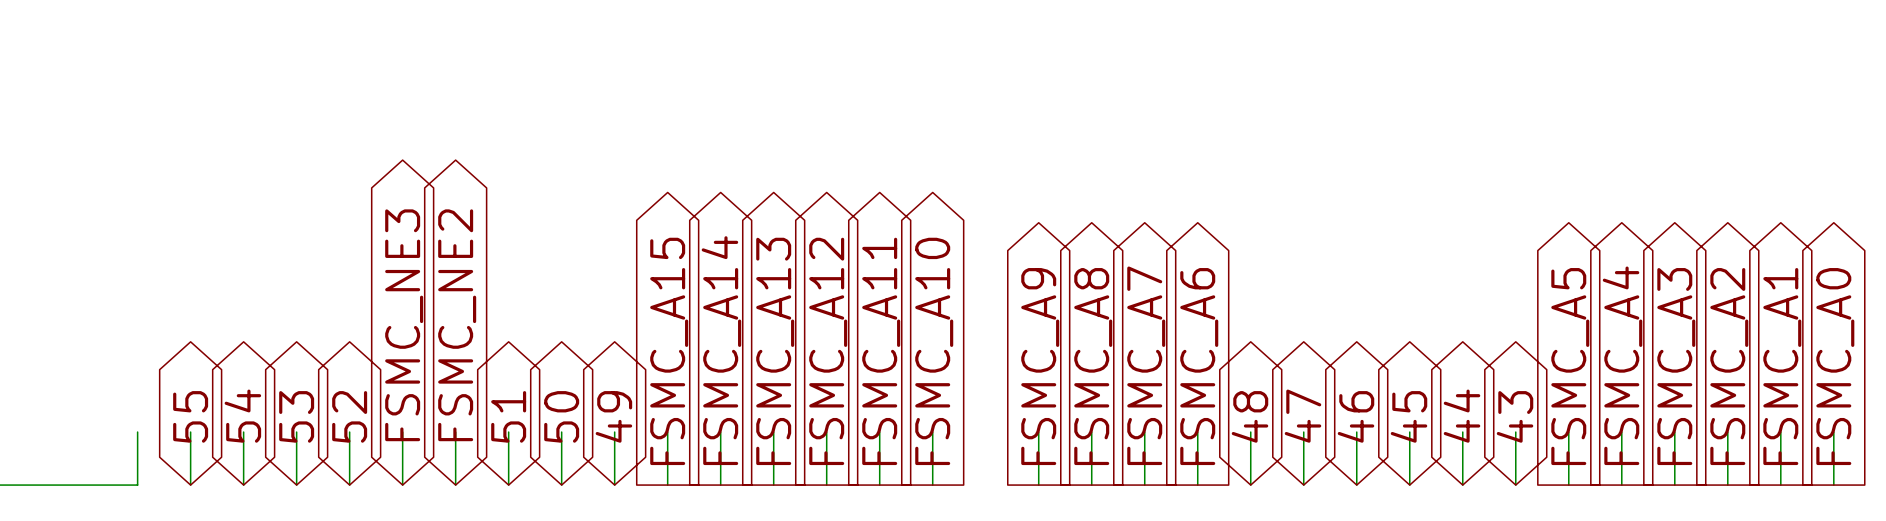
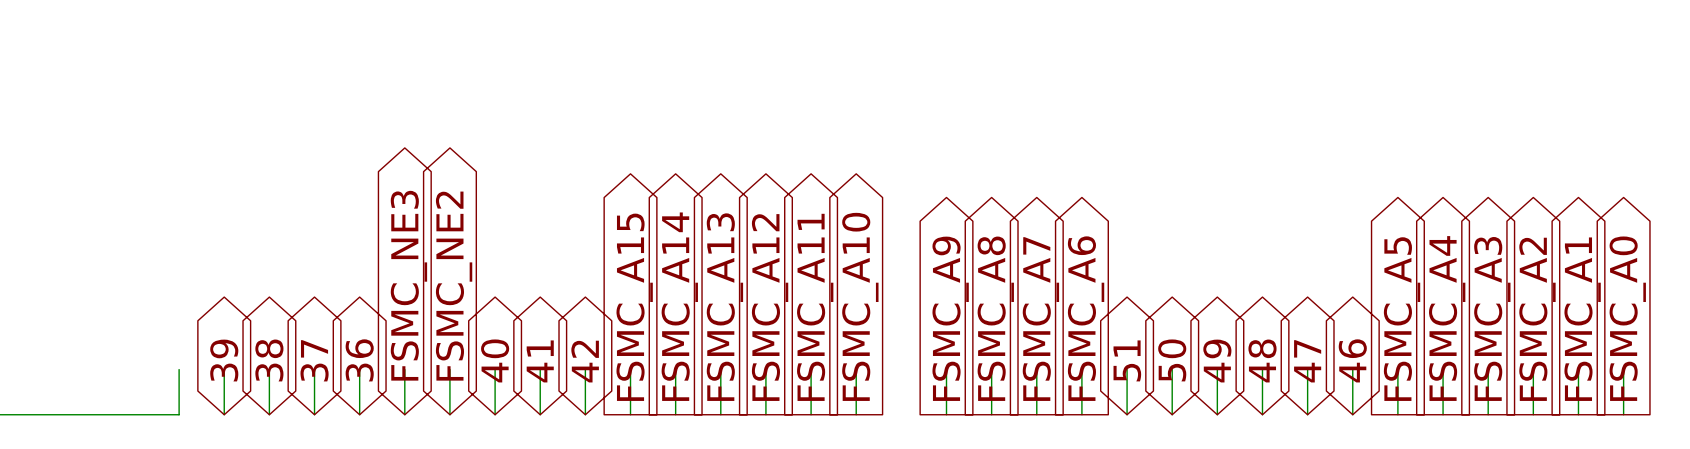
global label: 55 (190, 416) -> 39 (224, 360)
global label: 54 (242, 416) -> 38 (269, 360)
global label: 53 (296, 416) -> 37 (314, 360)
global label: 52 (349, 416) -> 36 (359, 360)
global label: 51 (508, 416) -> 40 (495, 360)
global label: 50 (561, 416) -> 41 (540, 361)
global label: 49 (613, 416) -> 42 (585, 361)
global label: 48 (1249, 416) -> 51 (1127, 360)
global label: 47 (1302, 416) -> 50 (1172, 360)
global label: 46 (1356, 416) -> 49 (1217, 361)
global label: 45 (1409, 416) -> 48 (1262, 360)
global label: 44 (1462, 416) -> 47 (1307, 361)
global label: 43 (1515, 416) -> 46 (1352, 360)

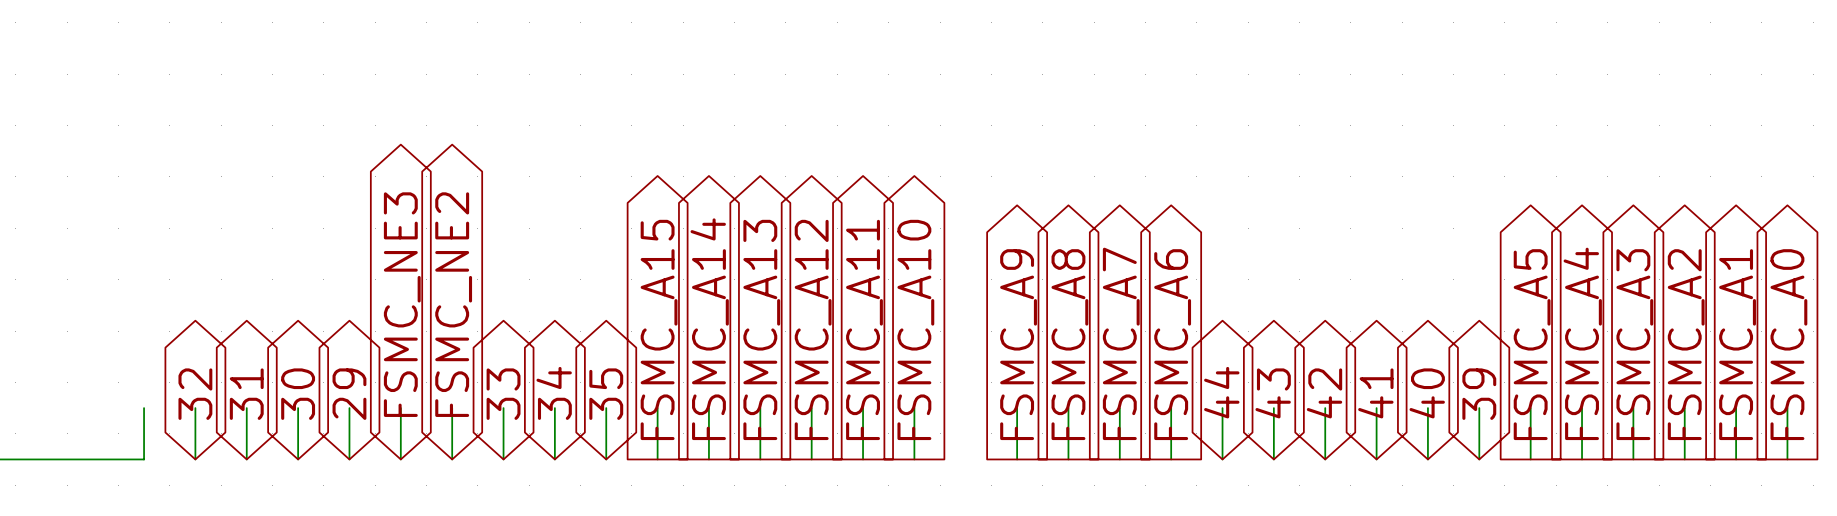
global label: 39 (224, 360) -> 32 (195, 394)
global label: 38 (269, 360) -> 31 (246, 394)
global label: 37 (314, 360) -> 30 (298, 394)
global label: 36 (359, 360) -> 29 (349, 394)
global label: 40 (495, 360) -> 33 (503, 394)
global label: 51 (1127, 360) -> 44 (1221, 392)
global label: 50 (1172, 360) -> 43 (1273, 393)
global label: 48 (1262, 360) -> 41 (1375, 393)
global label: 46 (1352, 360) -> 39 (1479, 394)
global label: 41 (540, 361) -> 34 (554, 393)
global label: 42 (585, 361) -> 35 (606, 394)
global label: 49 (1217, 361) -> 42 (1324, 393)
global label: 47 (1307, 361) -> 40 (1427, 393)

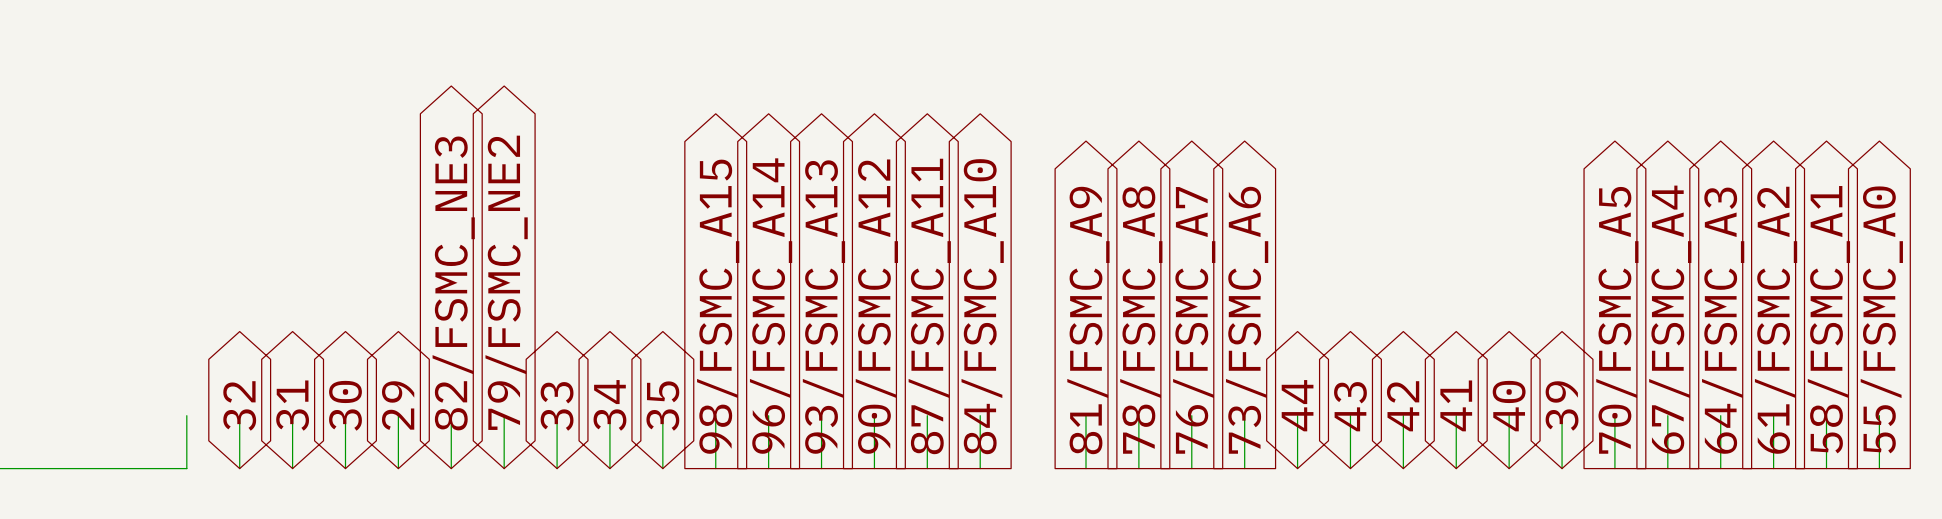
global label: FSMC_NE3 (402, 304) -> 82/FSMC_NE3 (453, 283)
global label: FSMC_NE2 (453, 304) -> 79/FSMC_NE2 (506, 282)
global label: FSMC_A15 (659, 329) -> 98/FSMC_A15 (718, 306)
global label: FSMC_A14 (709, 329) -> 96/FSMC_A14 (771, 306)
global label: FSMC_A13 (761, 329) -> 93/FSMC_A13 (823, 307)
global label: FSMC_A12 (813, 329) -> 90/FSMC_A12 (876, 306)
global label: FSMC_A11 (864, 329) -> 87/FSMC_A11 (929, 306)
global label: FSMC_A10 (915, 329) -> 84/FSMC_A10 (982, 306)
global label: FSMC_A7 (1121, 343) -> 76/FSMC_A7 (1194, 320)
global label: FSMC_A4 (1582, 343) -> 67/FSMC_A4 (1670, 319)
global label: FSMC_A9 (1018, 344) -> 81/FSMC_A9 (1088, 320)
global label: FSMC_A8 (1069, 344) -> 78/FSMC_A8 (1141, 320)
global label: FSMC_A6 (1172, 344) -> 73/FSMC_A6 (1247, 320)
global label: FSMC_A5 (1532, 344) -> 70/FSMC_A5 (1617, 320)
global label: FSMC_A3 (1634, 344) -> 64/FSMC_A3 (1723, 320)
global label: FSMC_A2 (1686, 344) -> 61/FSMC_A2 (1776, 320)
global label: FSMC_A1 (1737, 344) -> 58/FSMC_A1 (1828, 319)
global label: FSMC_A0 (1788, 344) -> 55/FSMC_A0 (1881, 319)

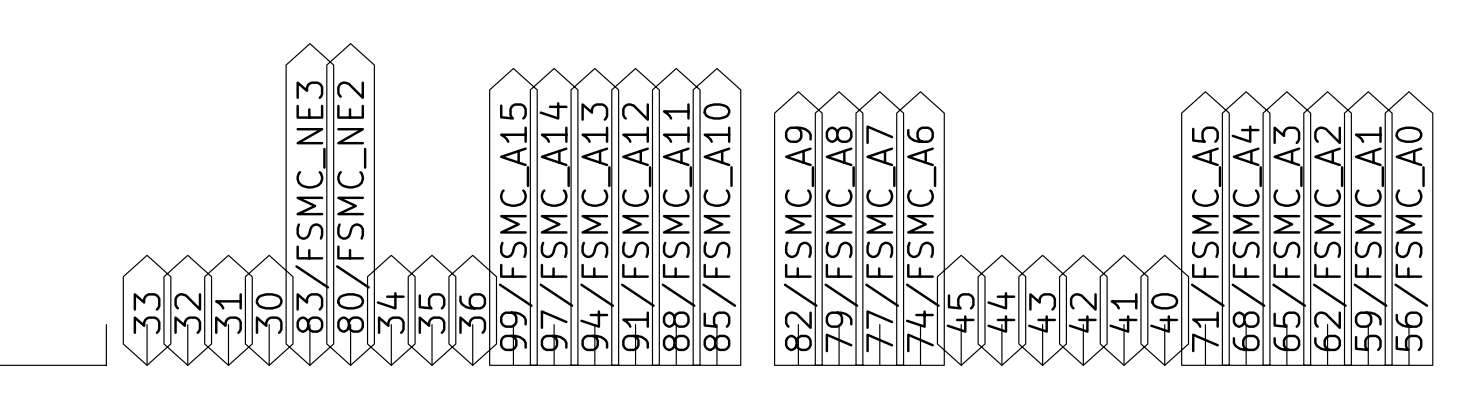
global label: 79/FSMC_NE2 (506, 282) -> 80/FSMC_NE2 (352, 207)
global label: 82/FSMC_NE3 (453, 283) -> 83/FSMC_NE3 (312, 207)
global label: 98/FSMC_A15 (718, 306) -> 99/FSMC_A15 (515, 227)
global label: 96/FSMC_A14 (771, 306) -> 97/FSMC_A14 (556, 226)
global label: 90/FSMC_A12 (876, 306) -> 91/FSMC_A12 (637, 227)
global label: 87/FSMC_A11 (929, 306) -> 88/FSMC_A11 (678, 227)
global label: 84/FSMC_A10 (982, 306) -> 85/FSMC_A10 (719, 227)
global label: 93/FSMC_A13 (823, 307) -> 94/FSMC_A13 (597, 227)
global label: 67/FSMC_A4 (1670, 319) -> 68/FSMC_A4 (1248, 238)
global label: 58/FSMC_A1 (1828, 319) -> 59/FSMC_A1 (1370, 238)
global label: 55/FSMC_A0 (1881, 319) -> 56/FSMC_A0 (1411, 238)
global label: 81/FSMC_A9 (1088, 320) -> 82/FSMC_A9 (800, 238)
global label: 78/FSMC_A8 (1141, 320) -> 79/FSMC_A8 (841, 239)
global label: 76/FSMC_A7 (1194, 320) -> 77/FSMC_A7 (882, 238)
global label: 73/FSMC_A6 (1247, 320) -> 74/FSMC_A6 (922, 239)
global label: 70/FSMC_A5 (1617, 320) -> 71/FSMC_A5 (1207, 239)
global label: 64/FSMC_A3 (1723, 320) -> 65/FSMC_A3 (1289, 238)
global label: 61/FSMC_A2 (1776, 320) -> 62/FSMC_A2 (1329, 238)
global label: 32 (239, 405) -> 33 (147, 313)
global label: 31 (292, 405) -> 32 (187, 313)
global label: 30 (345, 405) -> 31 (228, 313)
global label: 29 (398, 405) -> 30 (269, 313)
global label: 34 (609, 405) -> 35 (432, 313)
global label: 44 (1297, 405) -> 45 (960, 312)
global label: 41 (1456, 405) -> 42 (1082, 312)
global label: 39 (1562, 405) -> 40 (1164, 312)
global label: 33 (557, 406) -> 34 (390, 312)
global label: 35 (662, 406) -> 36 (472, 313)
global label: 43 (1350, 406) -> 44 (1001, 312)
global label: 42 (1403, 406) -> 43 (1042, 312)
global label: 40 (1509, 406) -> 41 (1123, 312)

